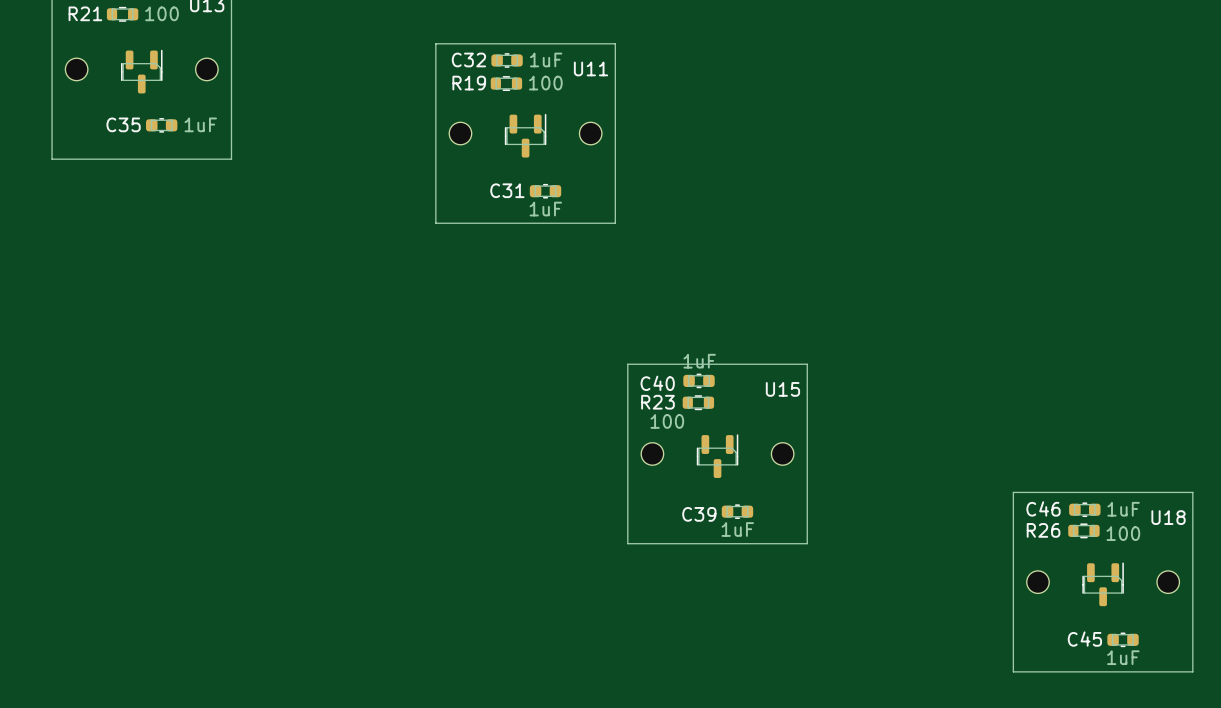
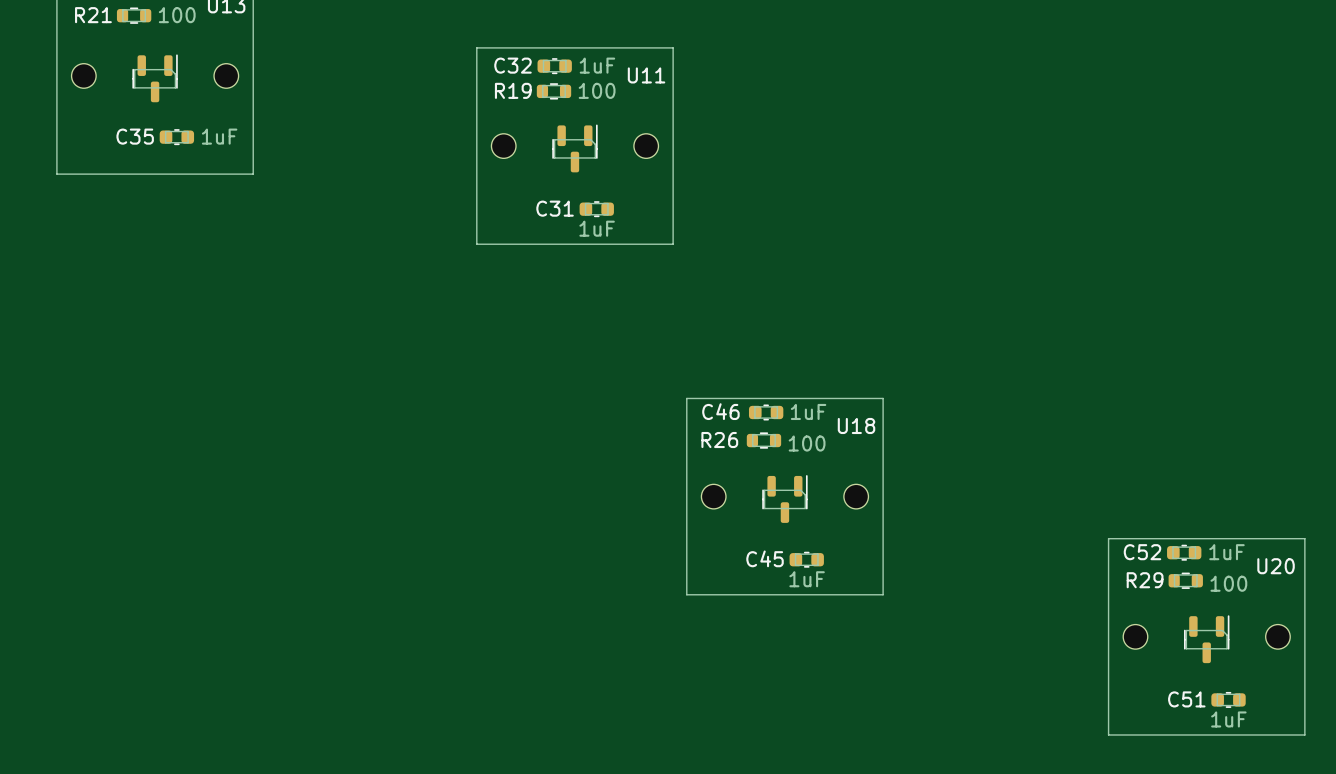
C40: 1uF (699, 380) -> none
U15 name: U15 (782, 389) -> U18 (856, 425)
R23 name: R23 (657, 402) -> R26 (719, 440)
R23 value position: 100 (667, 421) -> 100 (807, 443)
C52: none -> 1uF (1184, 552)
C46 position: (1084, 509) -> (766, 412)
C39 name: C39 (699, 514) -> C45 (765, 558)
U18 name: U18 (1168, 517) -> U20 (1276, 566)
R26 name: R26 (1043, 530) -> R29 (1145, 580)
C45 name: C45 (1084, 639) -> C51 (1186, 699)

